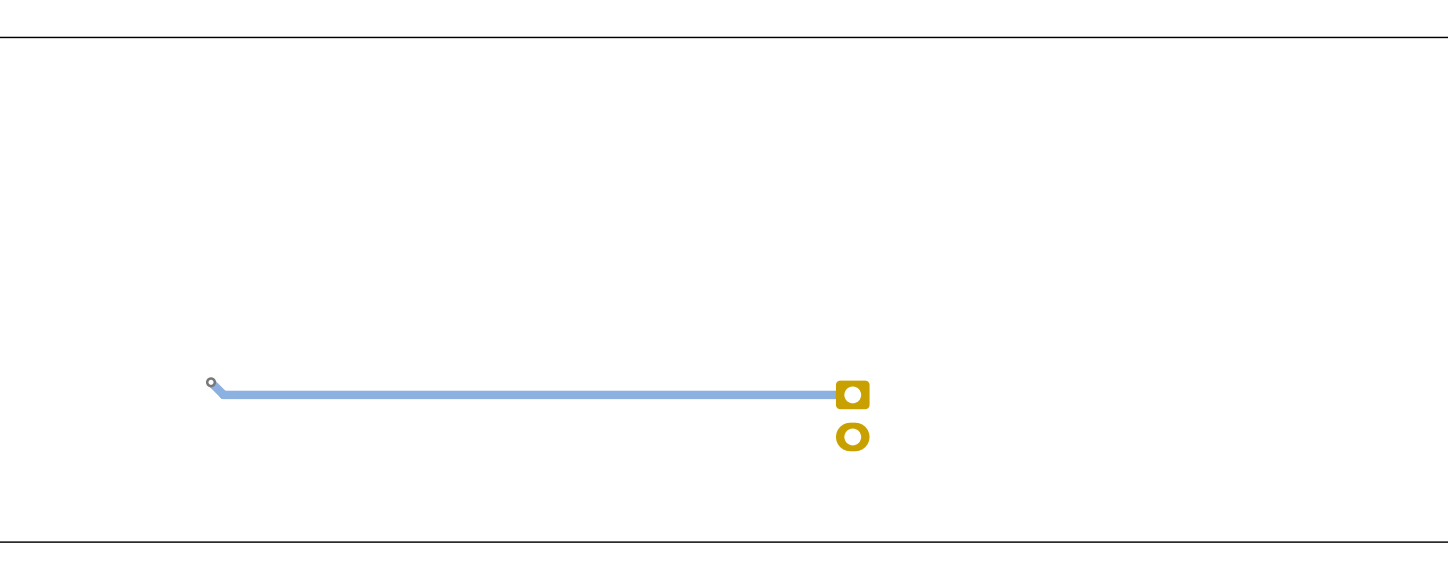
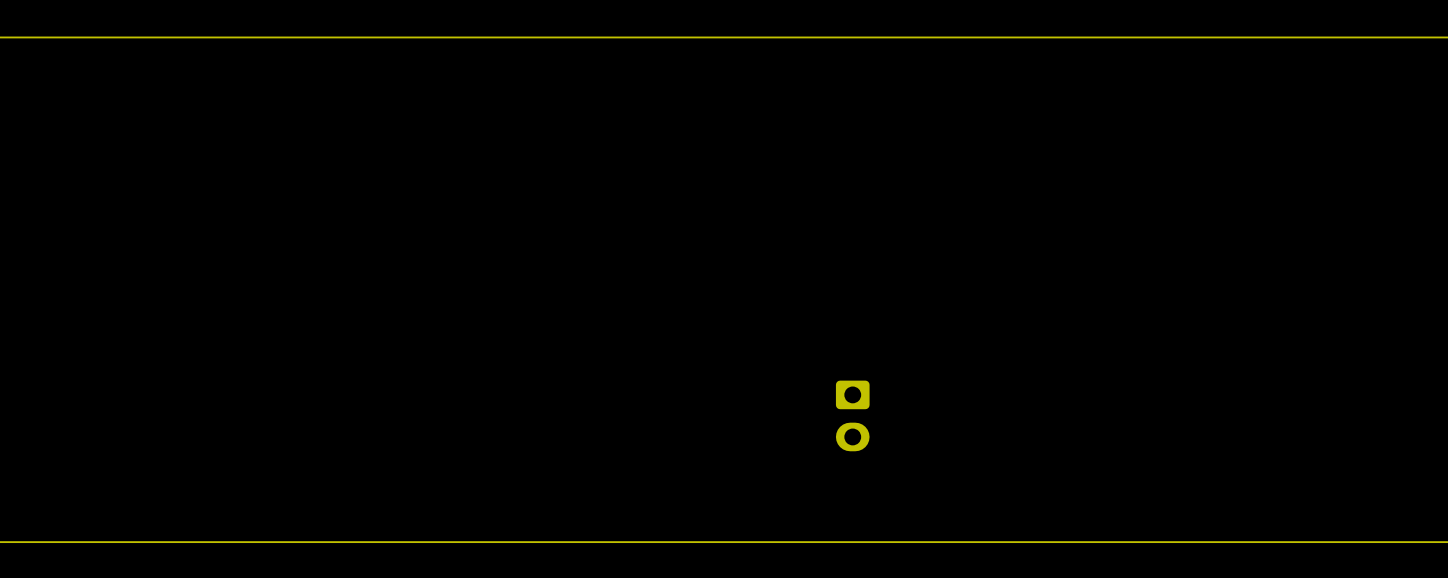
track: (211, 382) (223, 394) (852, 394) -> none
via: (211, 382) -> none

